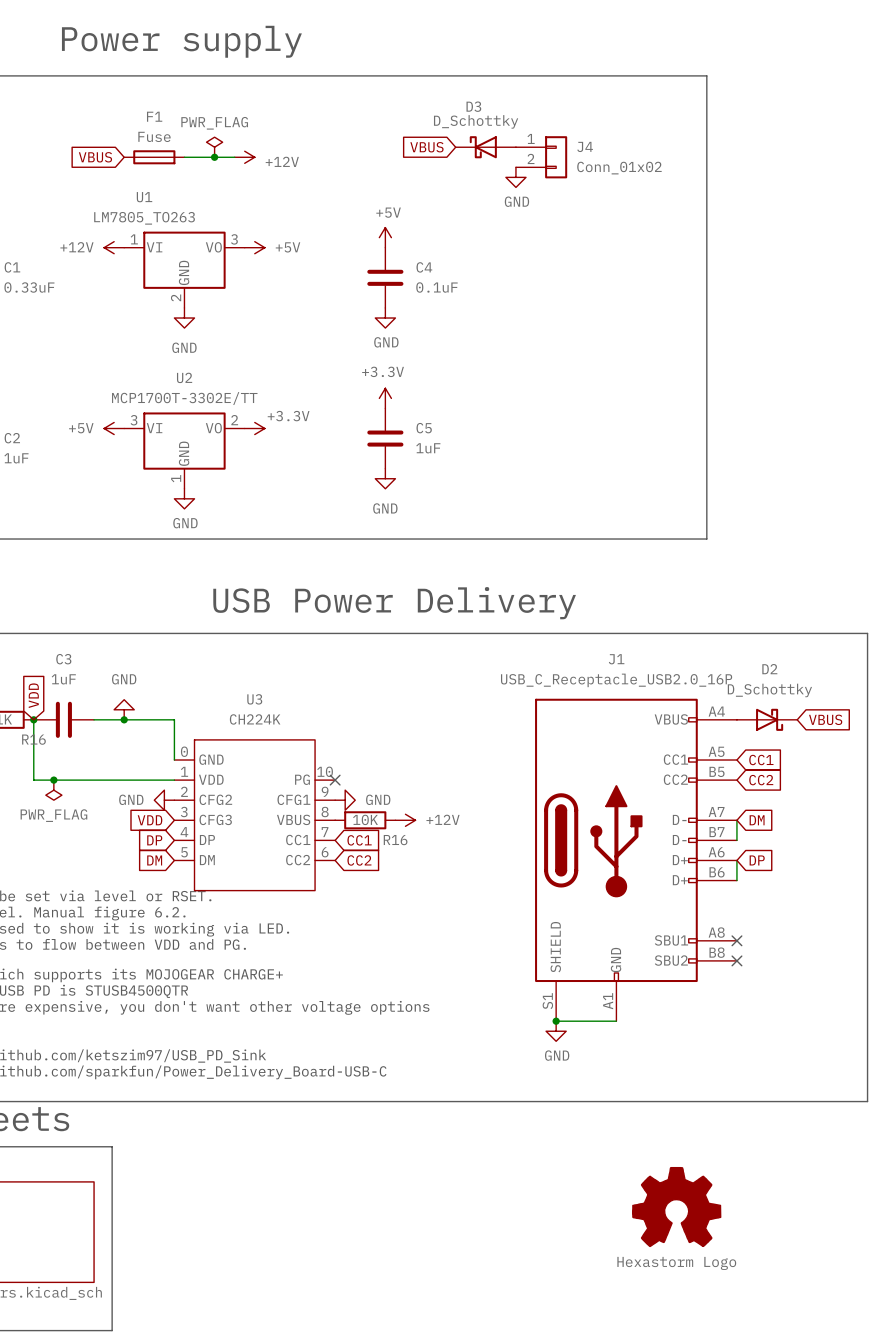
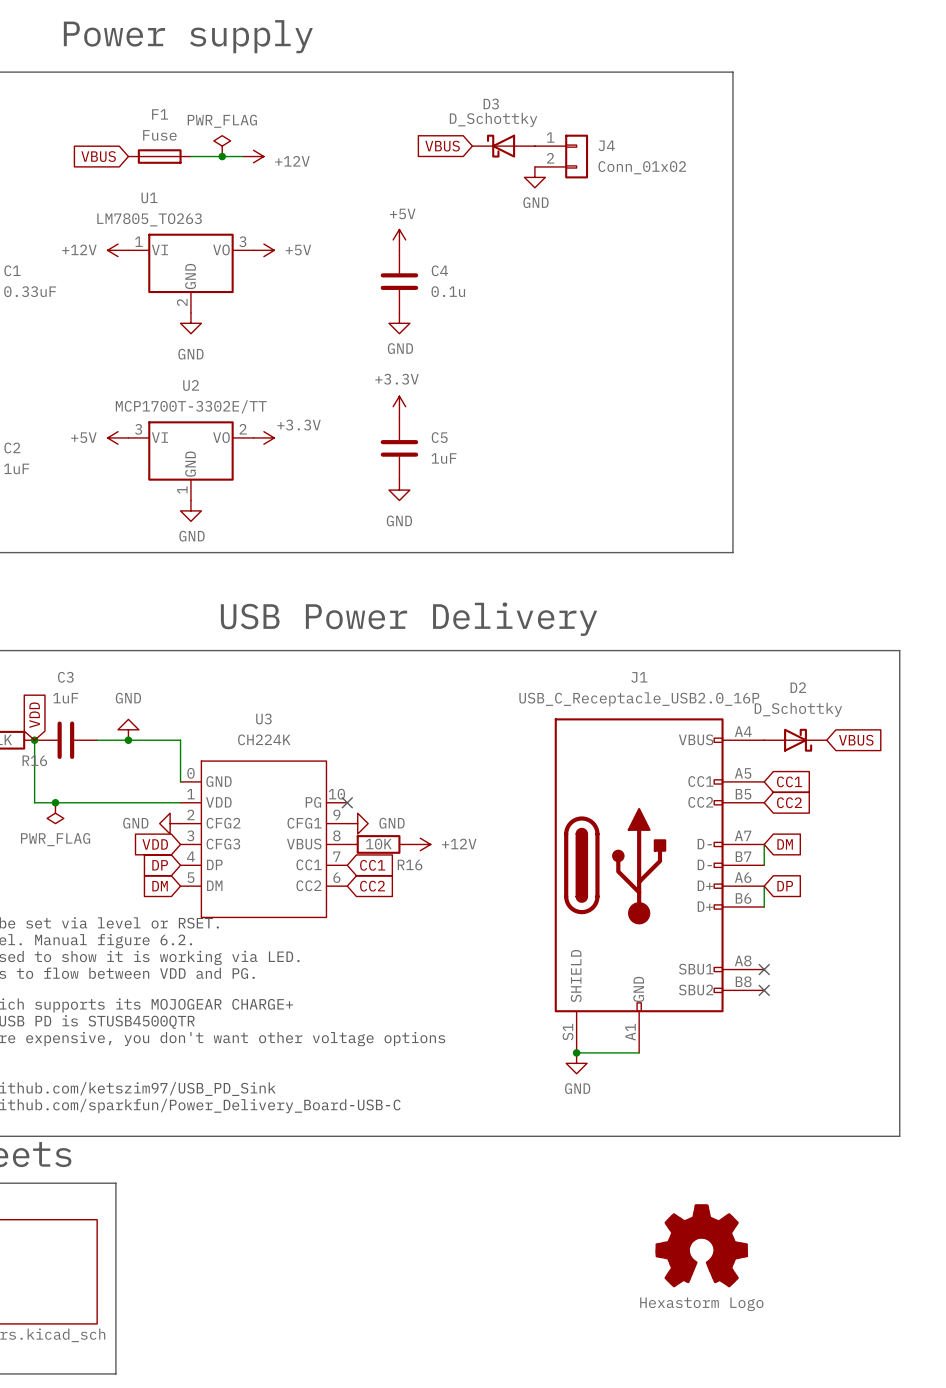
C4 value: 0.1uF (436, 287) -> 0.1u (448, 291)

